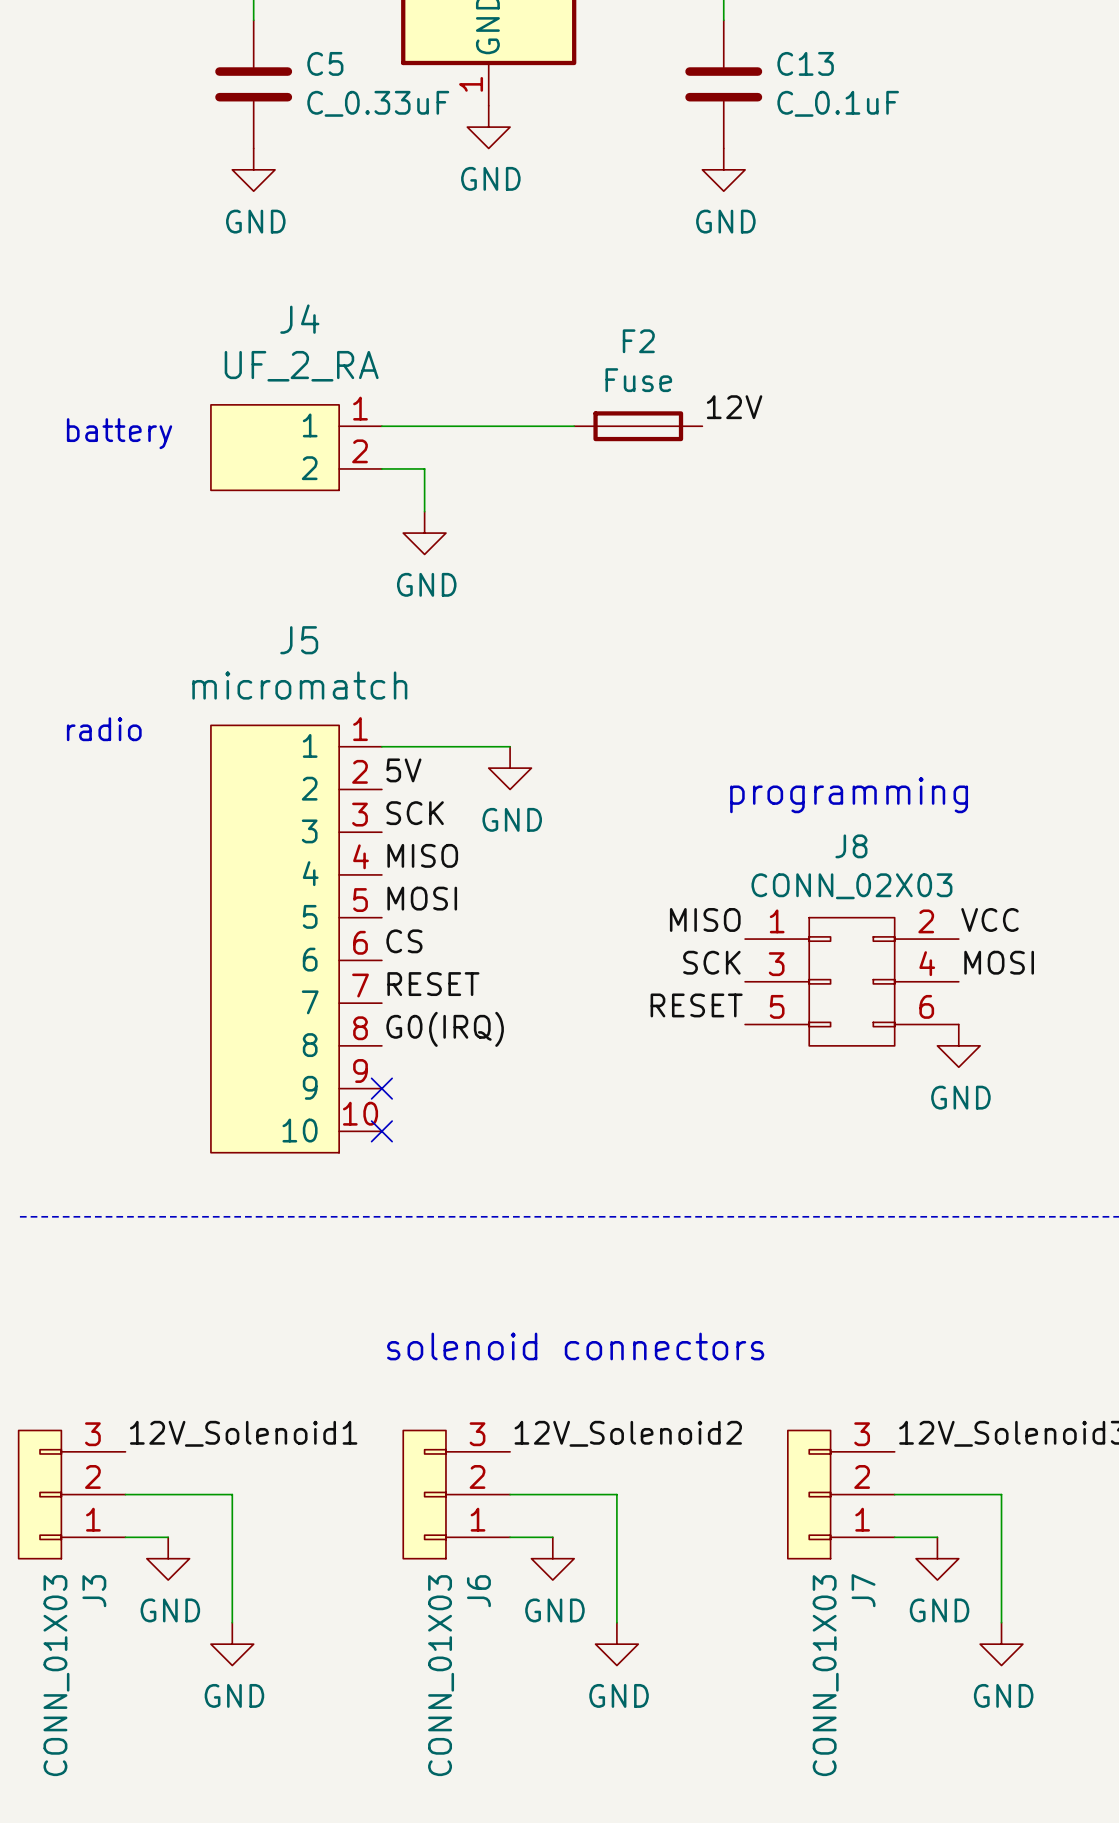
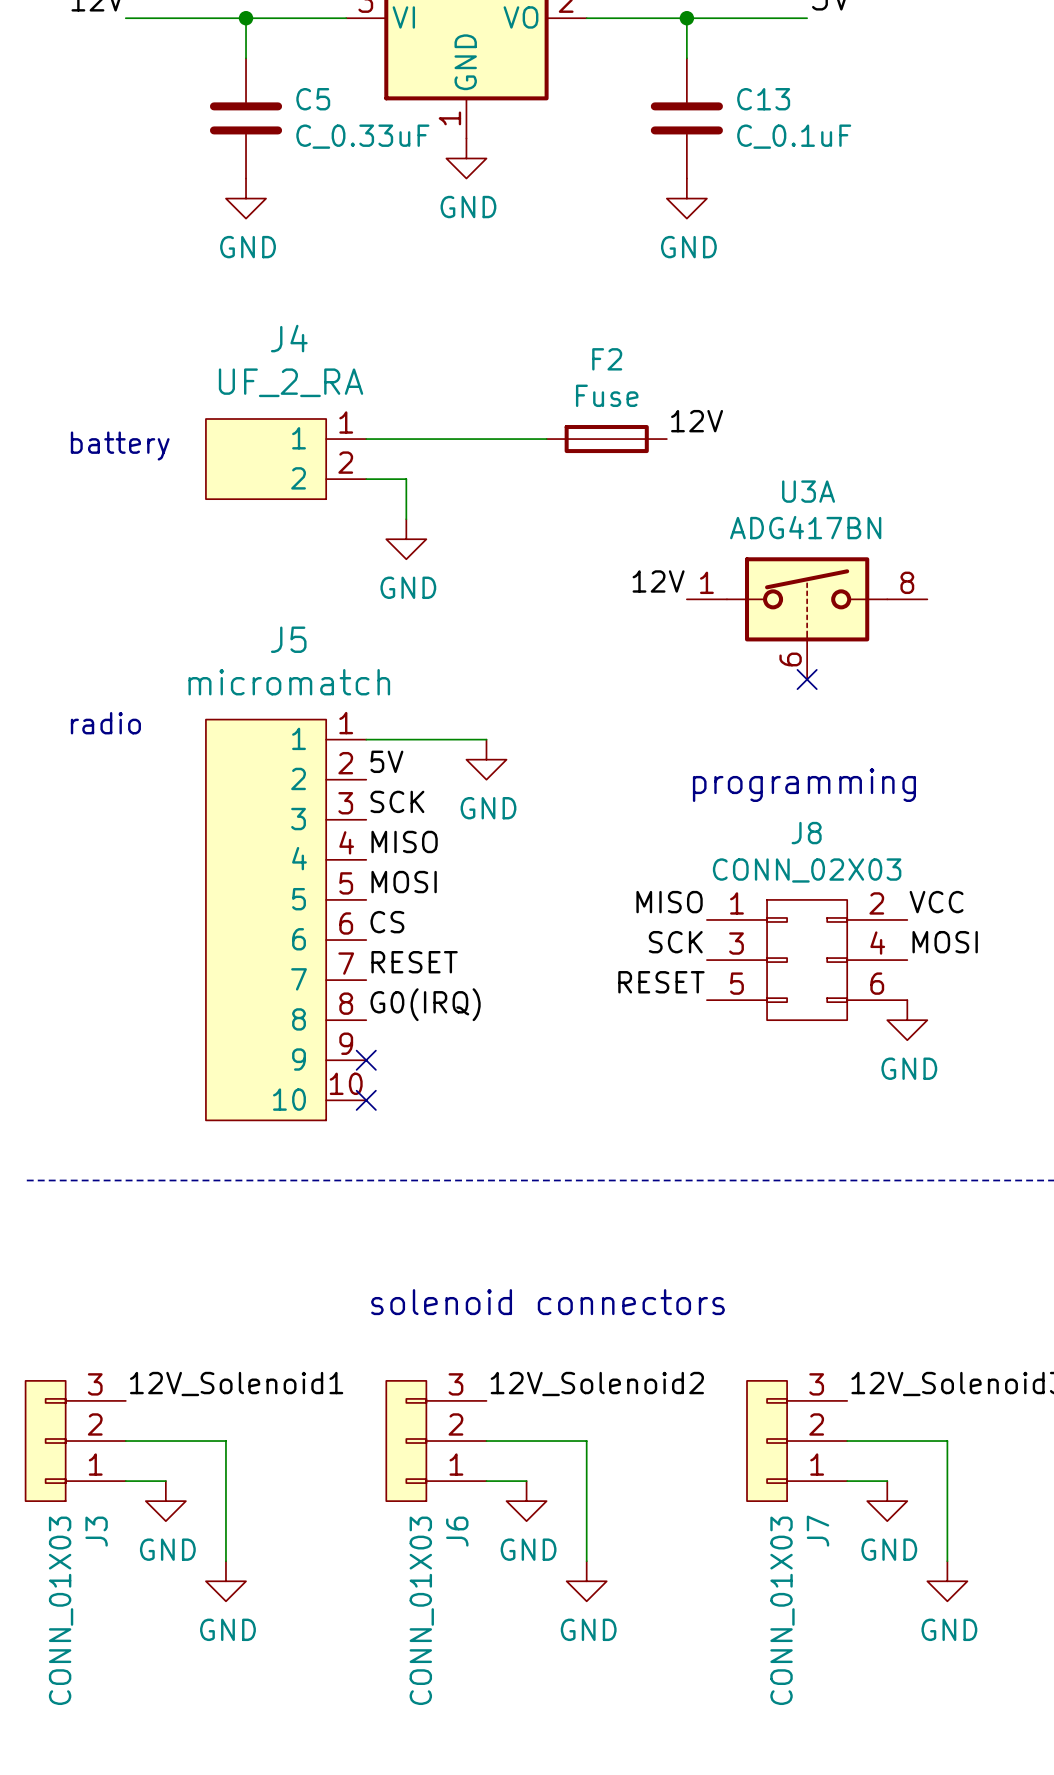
label: none -> 12V (658, 581)
U3A: none -> ADG417BN (807, 618)
no-connect mark: none -> (807, 679)

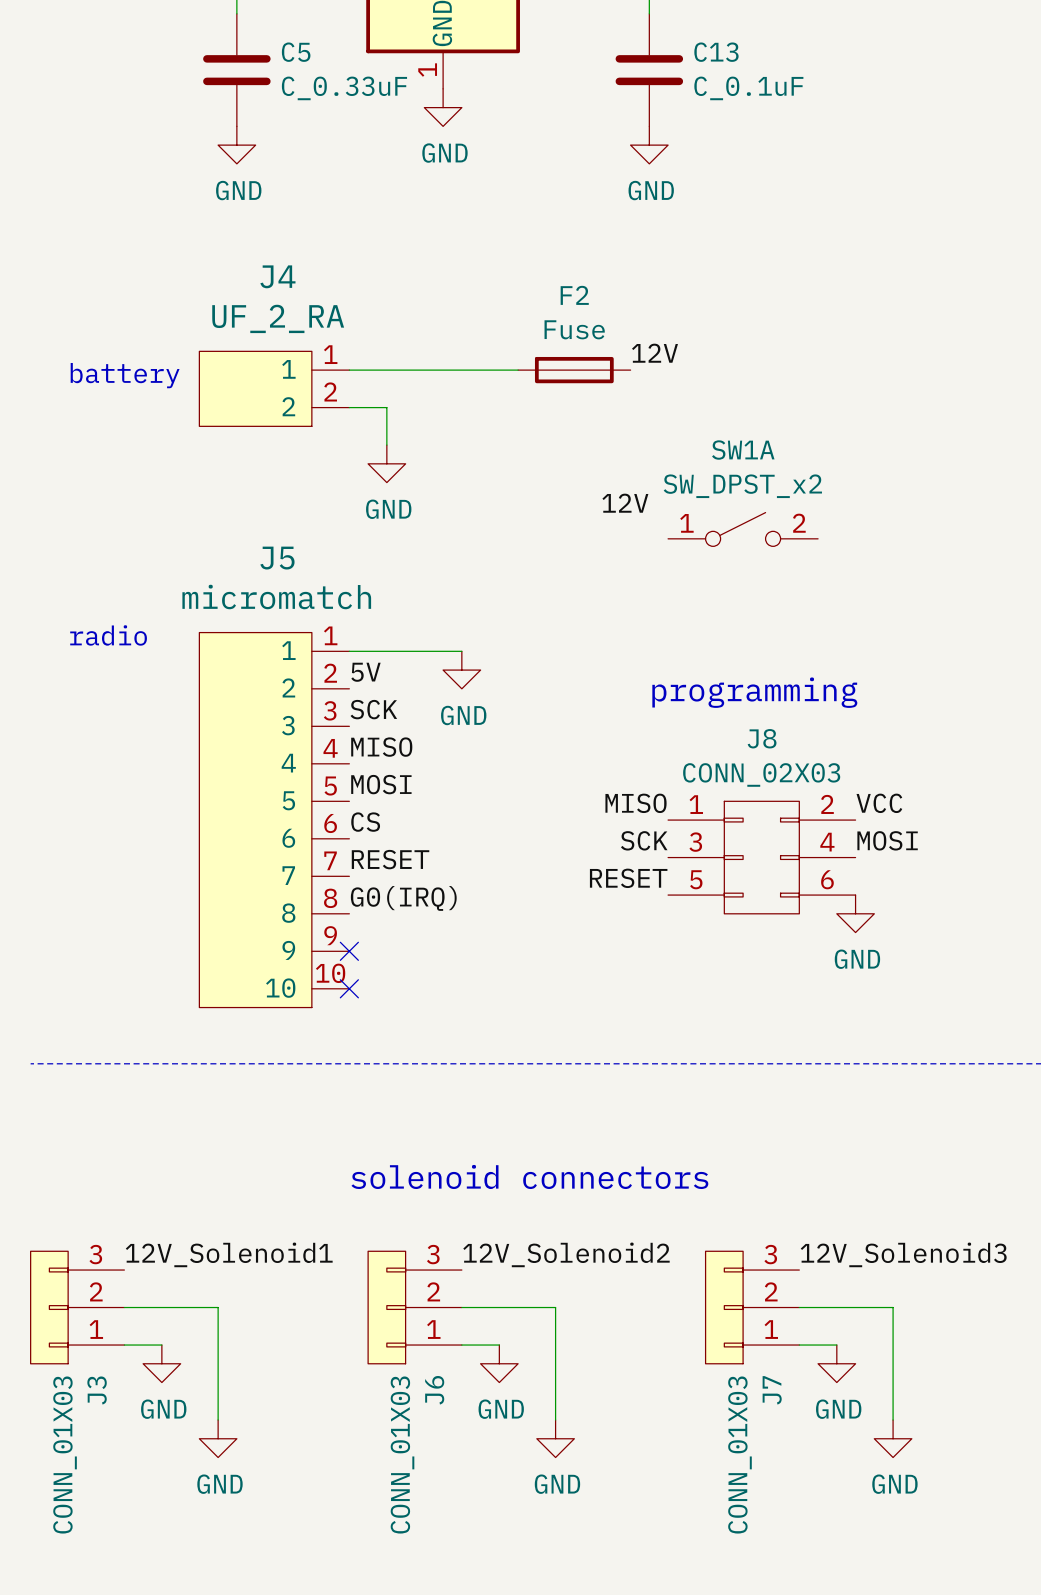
SW1A: none -> SW_DPST_x2 (743, 529)
U3A: ADG417BN (807, 618) -> none
no-connect mark: (807, 679) -> none

